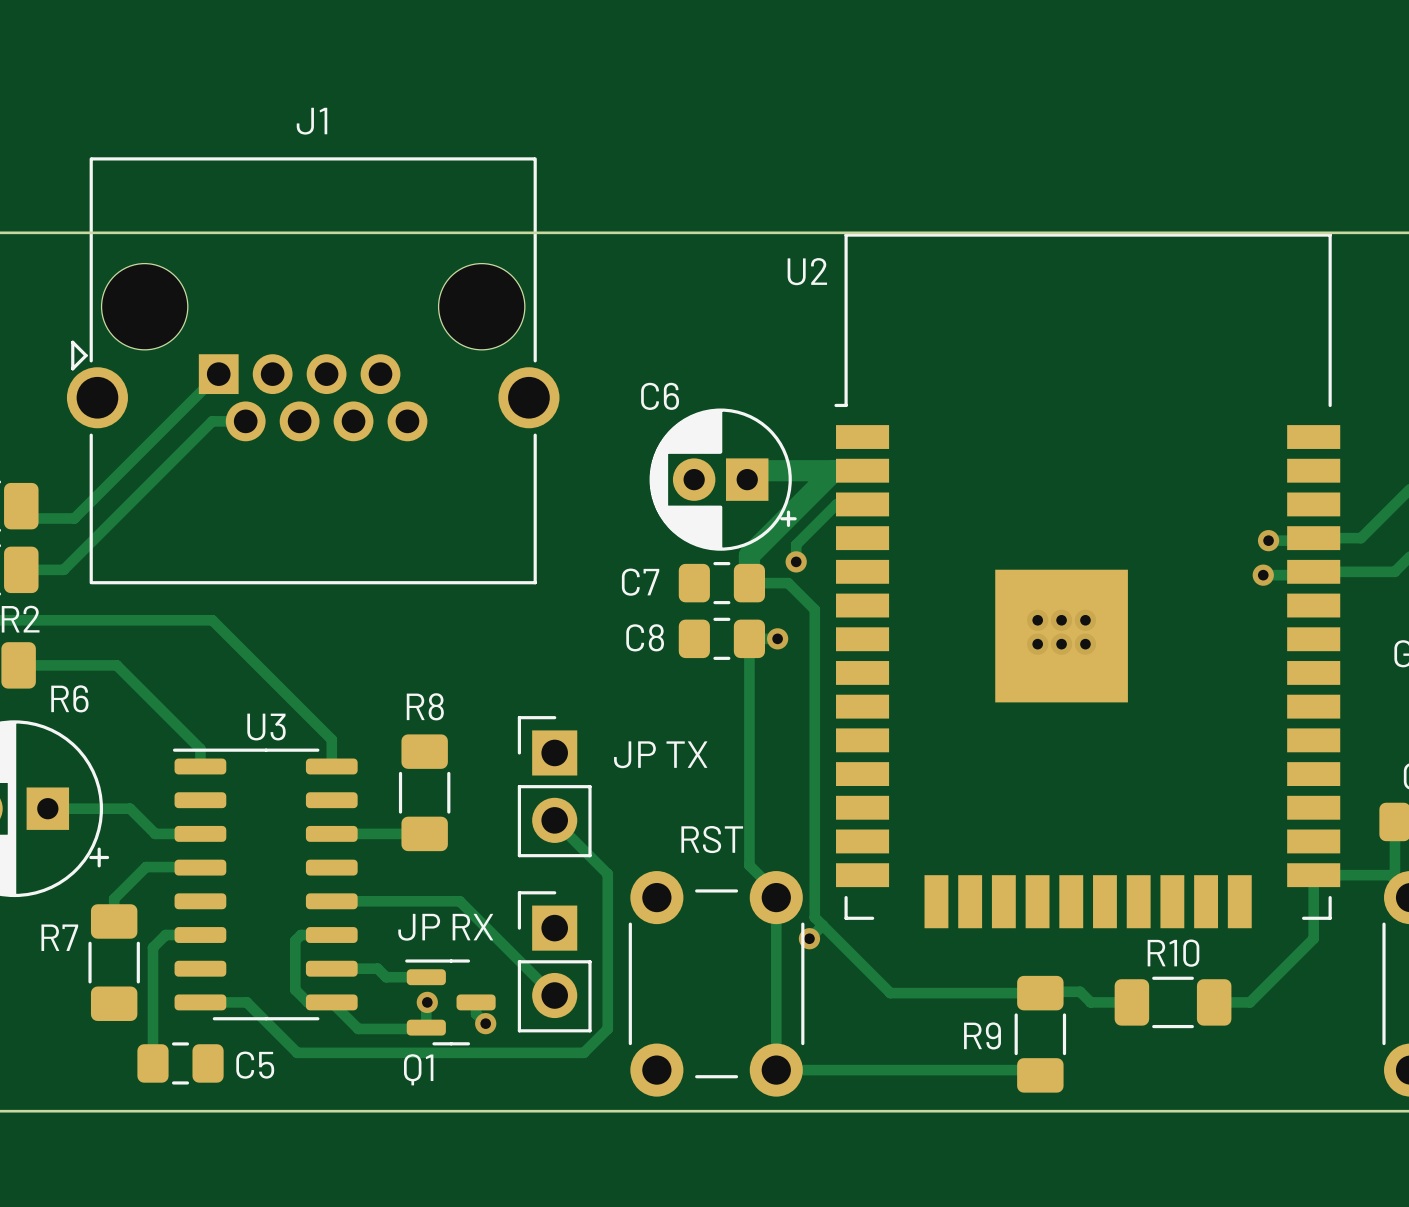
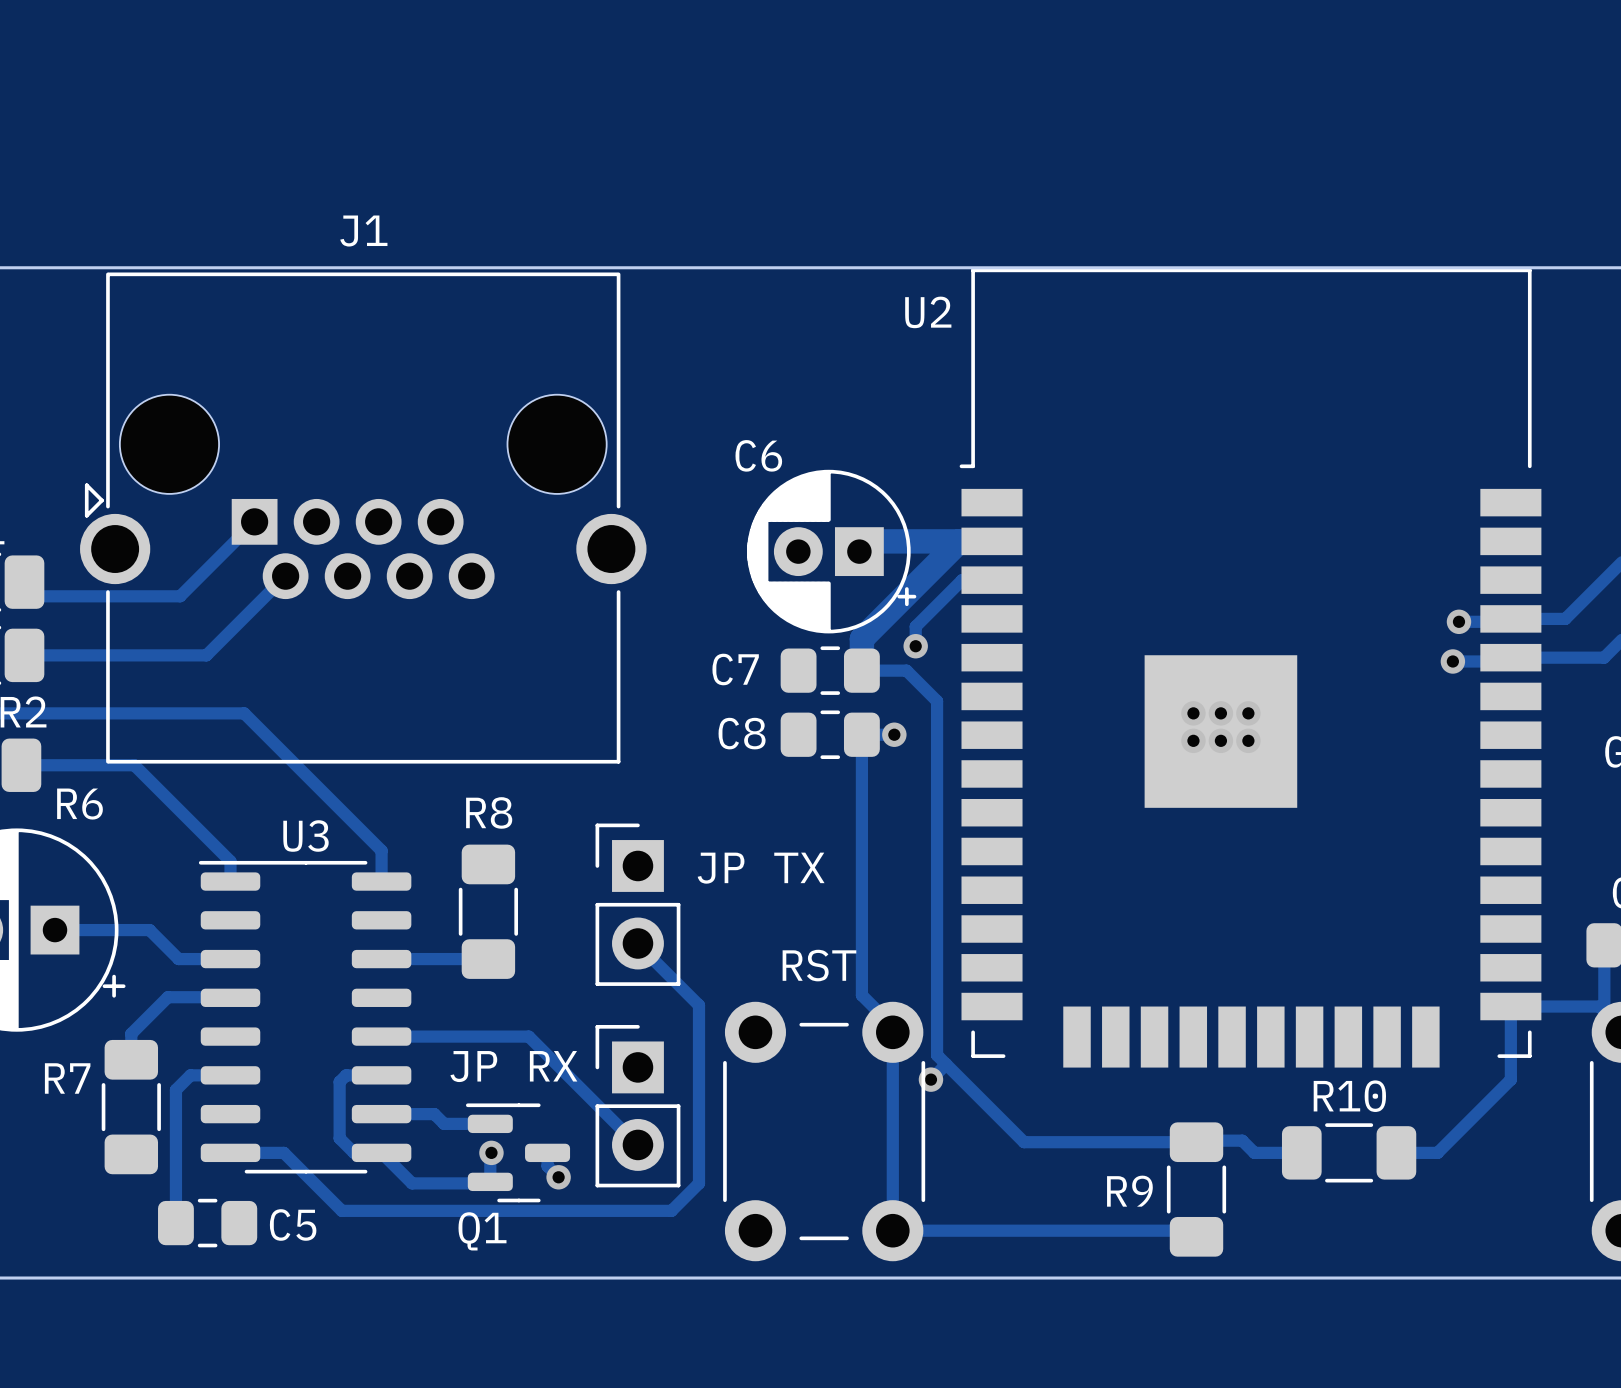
J1 position: (313, 370) -> (363, 518)
track: (218, 374) (74, 518) -> (254, 521) (180, 596) (85, 596)
track: (245, 421) (212, 421) (63, 569) -> (285, 576) (206, 655) (73, 655)

